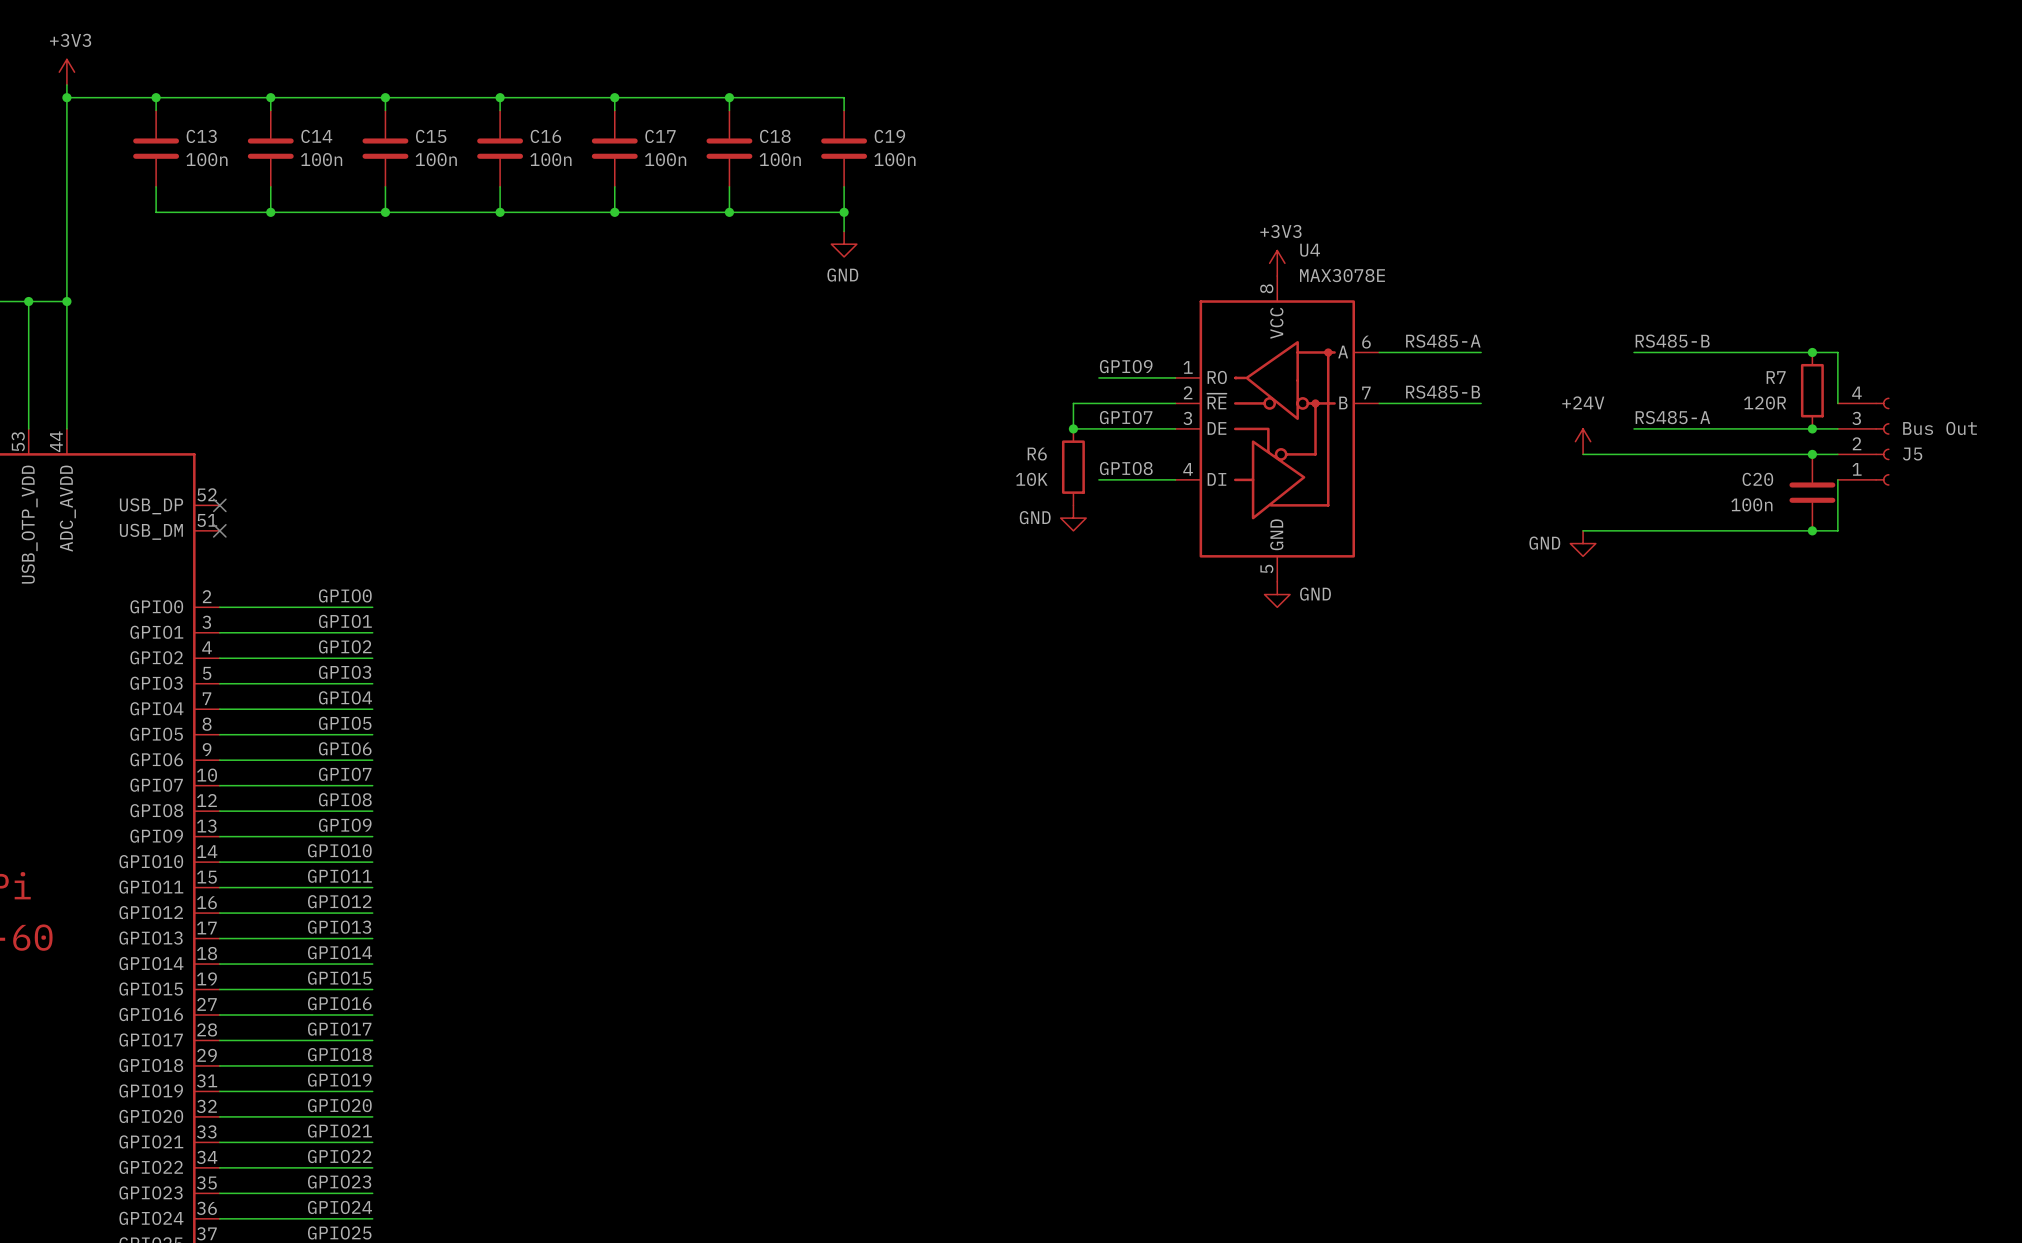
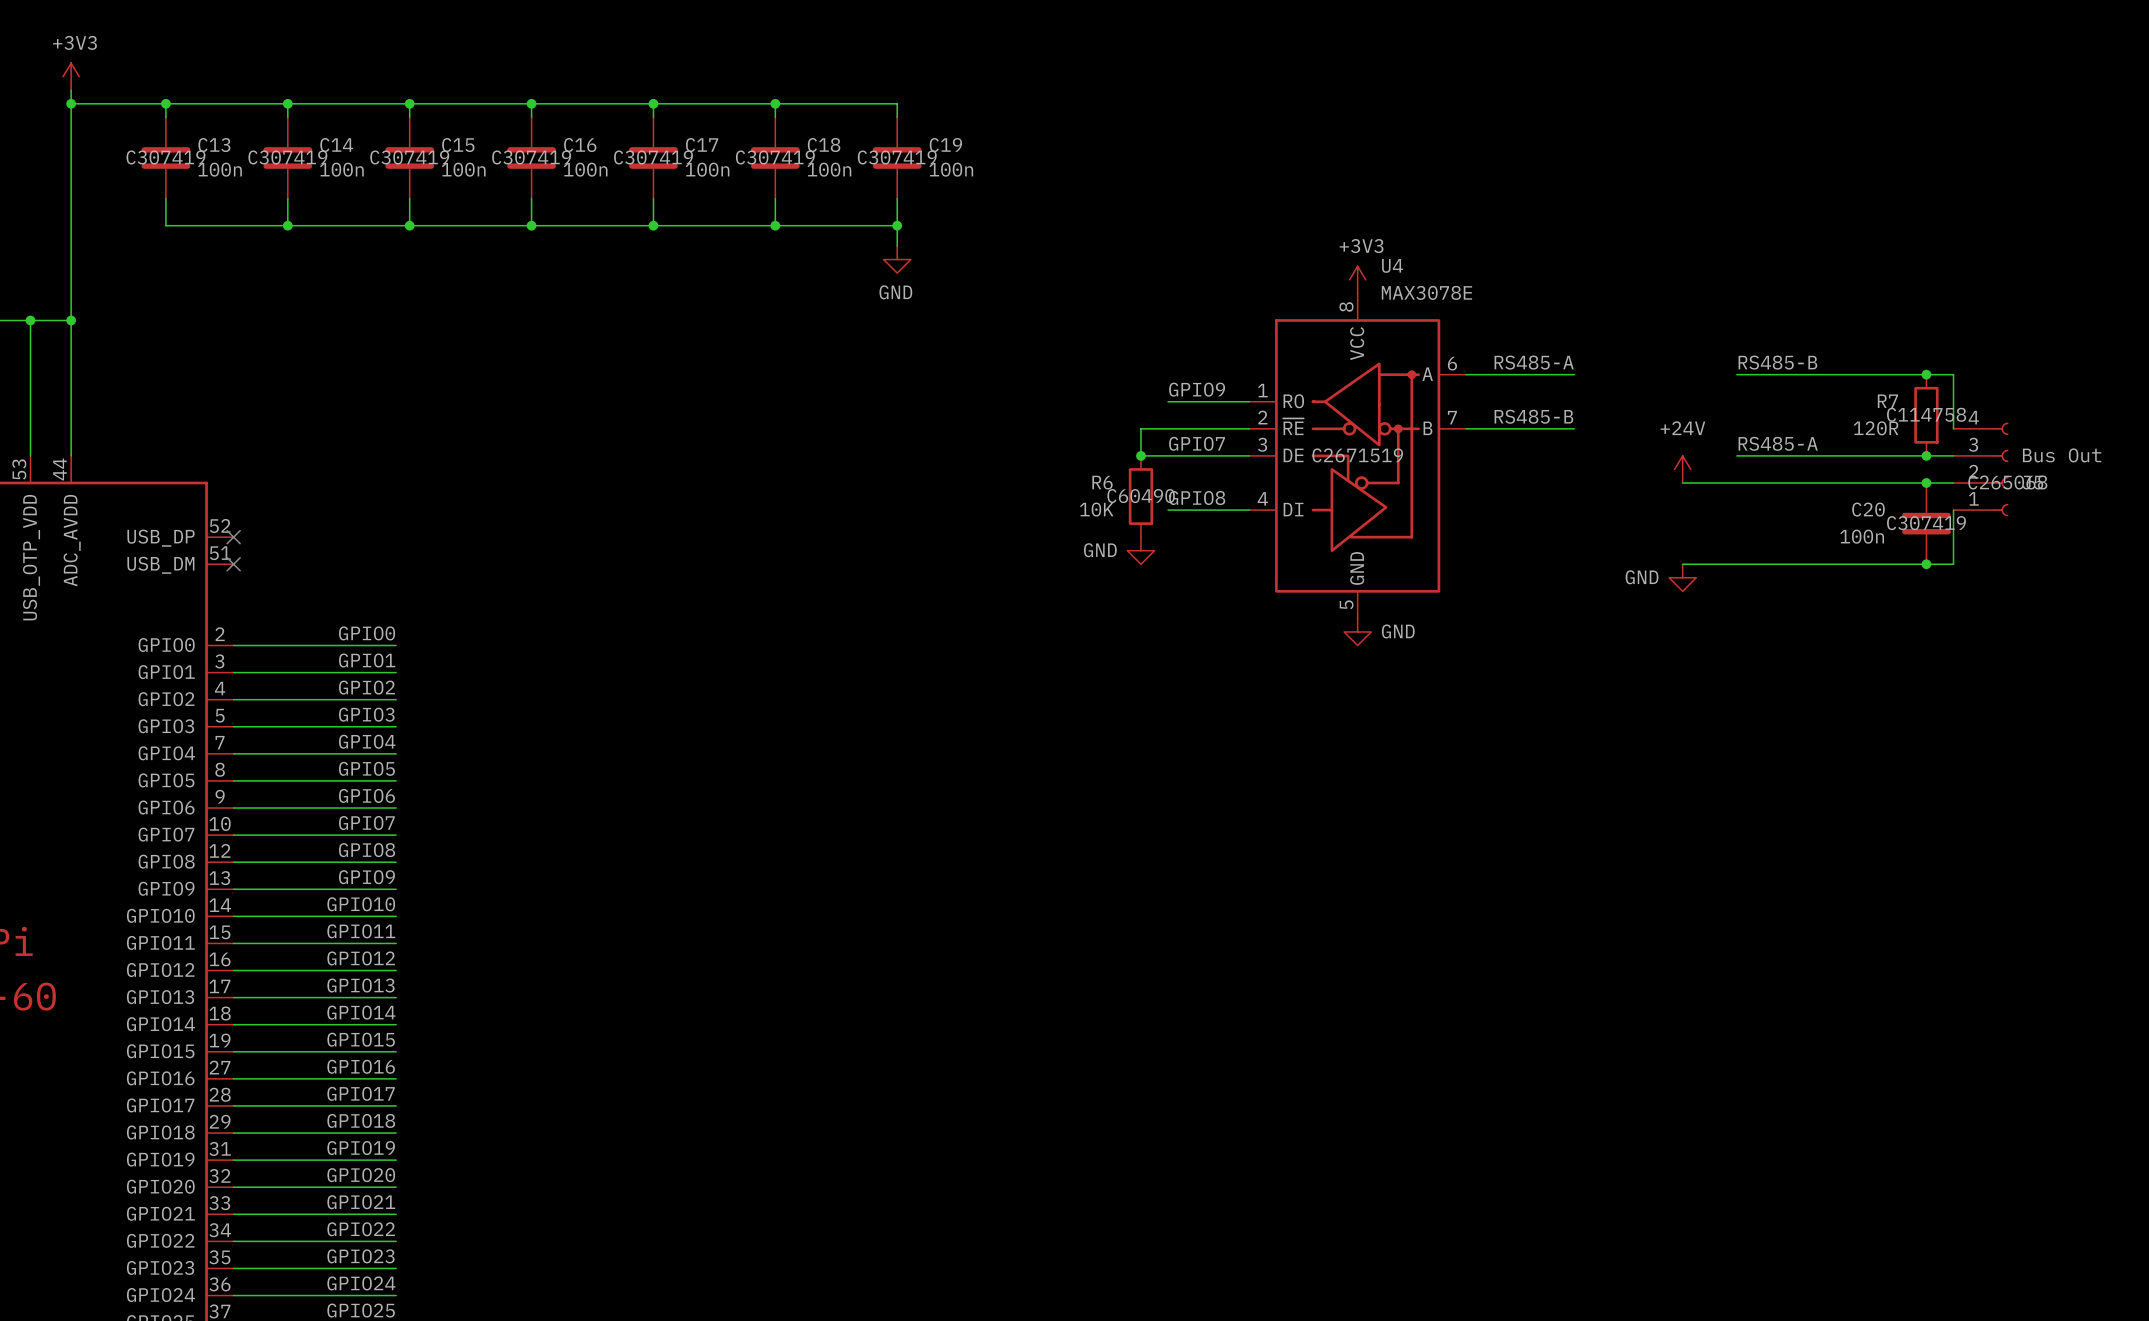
C13 text: none -> C307419 (165, 157)
C14 text: none -> C307419 (287, 157)
C15 text: none -> C307419 (409, 157)
C16 text: none -> C307419 (531, 157)
C17 text: none -> C307419 (653, 157)
C18 text: none -> C307419 (775, 157)
C19 text: none -> C307419 (897, 157)
R7 text: none -> C114758 (1926, 414)
U4 text: none -> C2671519 (1357, 455)
J5 text: none -> C265068 (2007, 482)
R6 text: none -> C60490 (1141, 496)
C20 text: none -> C307419 (1926, 523)

